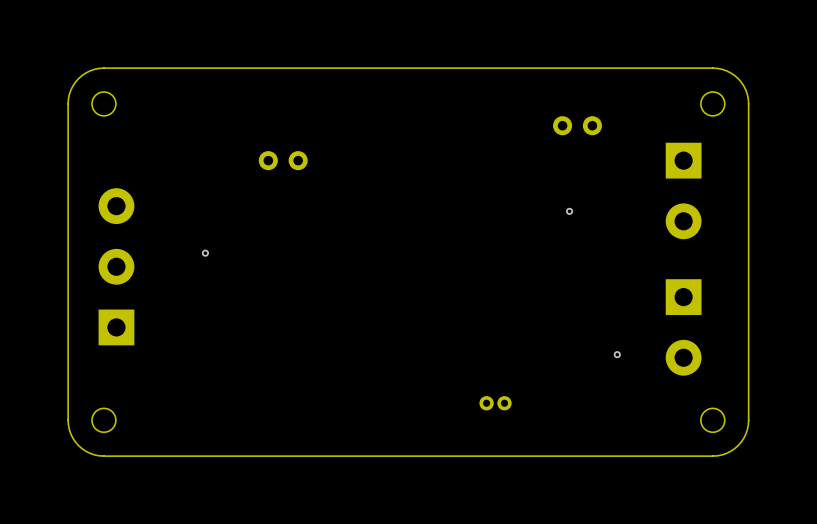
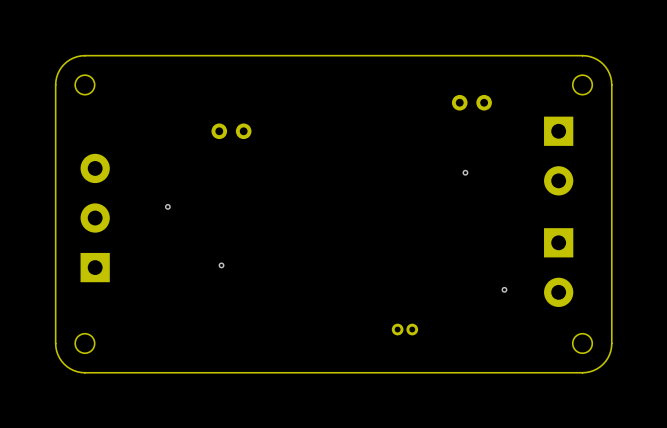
via: none -> (221, 265)

